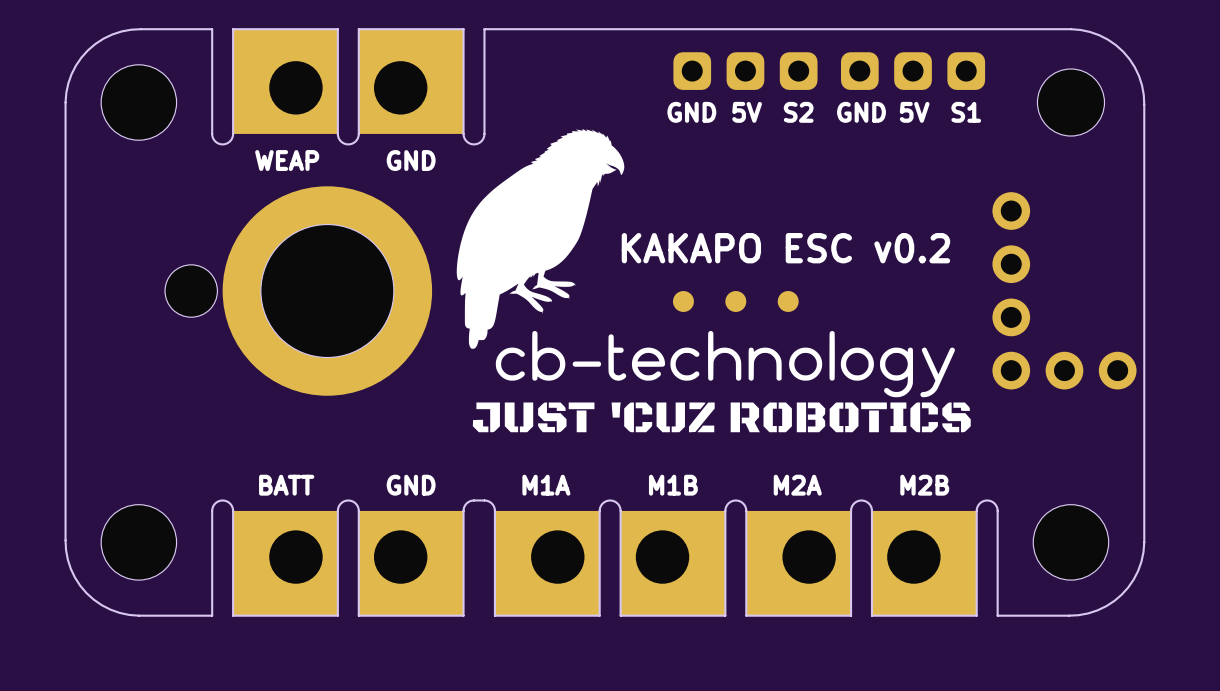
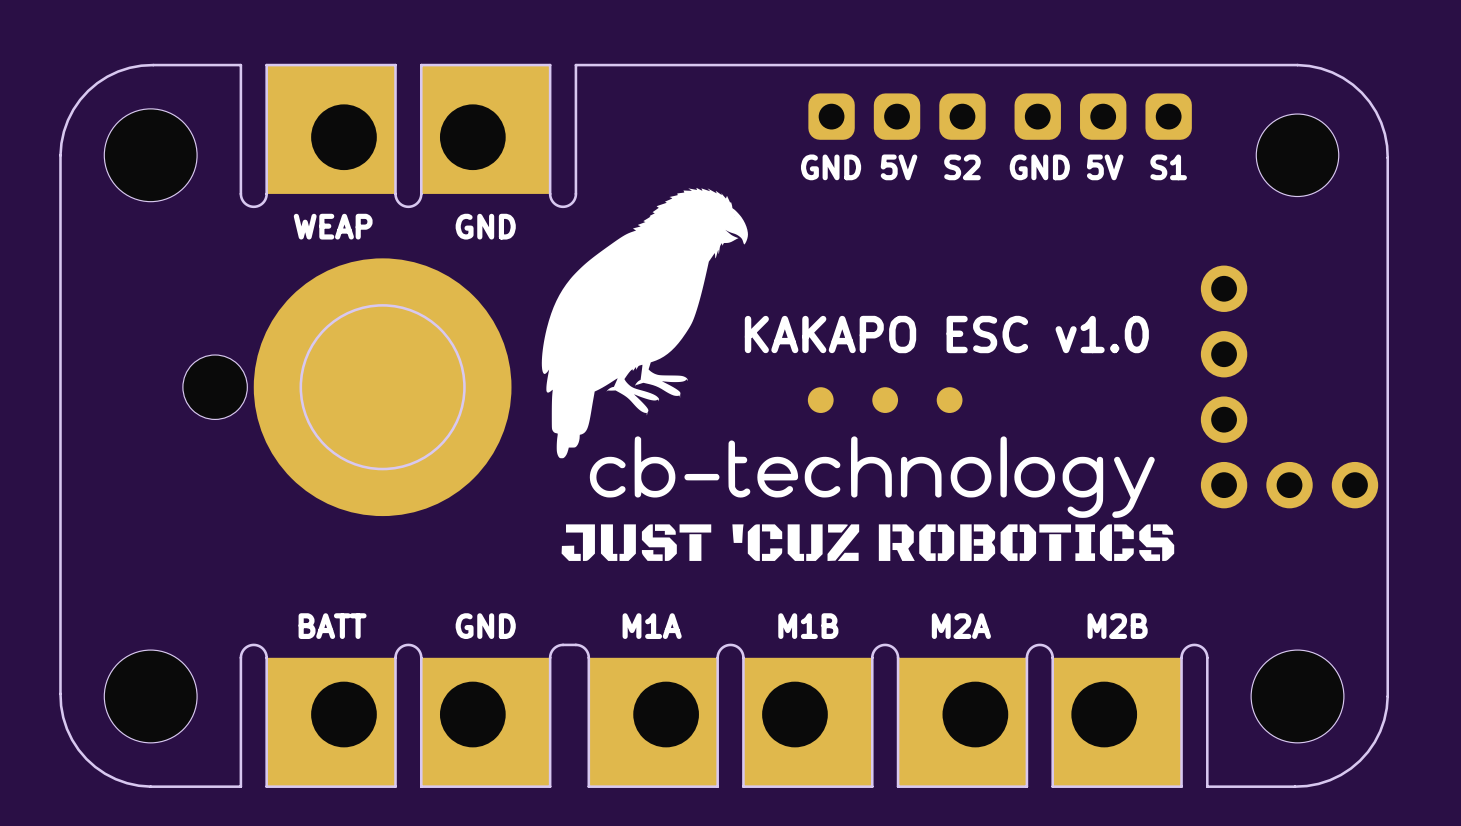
part footprint: [222, 186, 433, 396] -> [253, 258, 512, 517]
text: KAKAPO ESC v0.2 (785, 248) -> KAKAPO ESC v1.0 (946, 334)

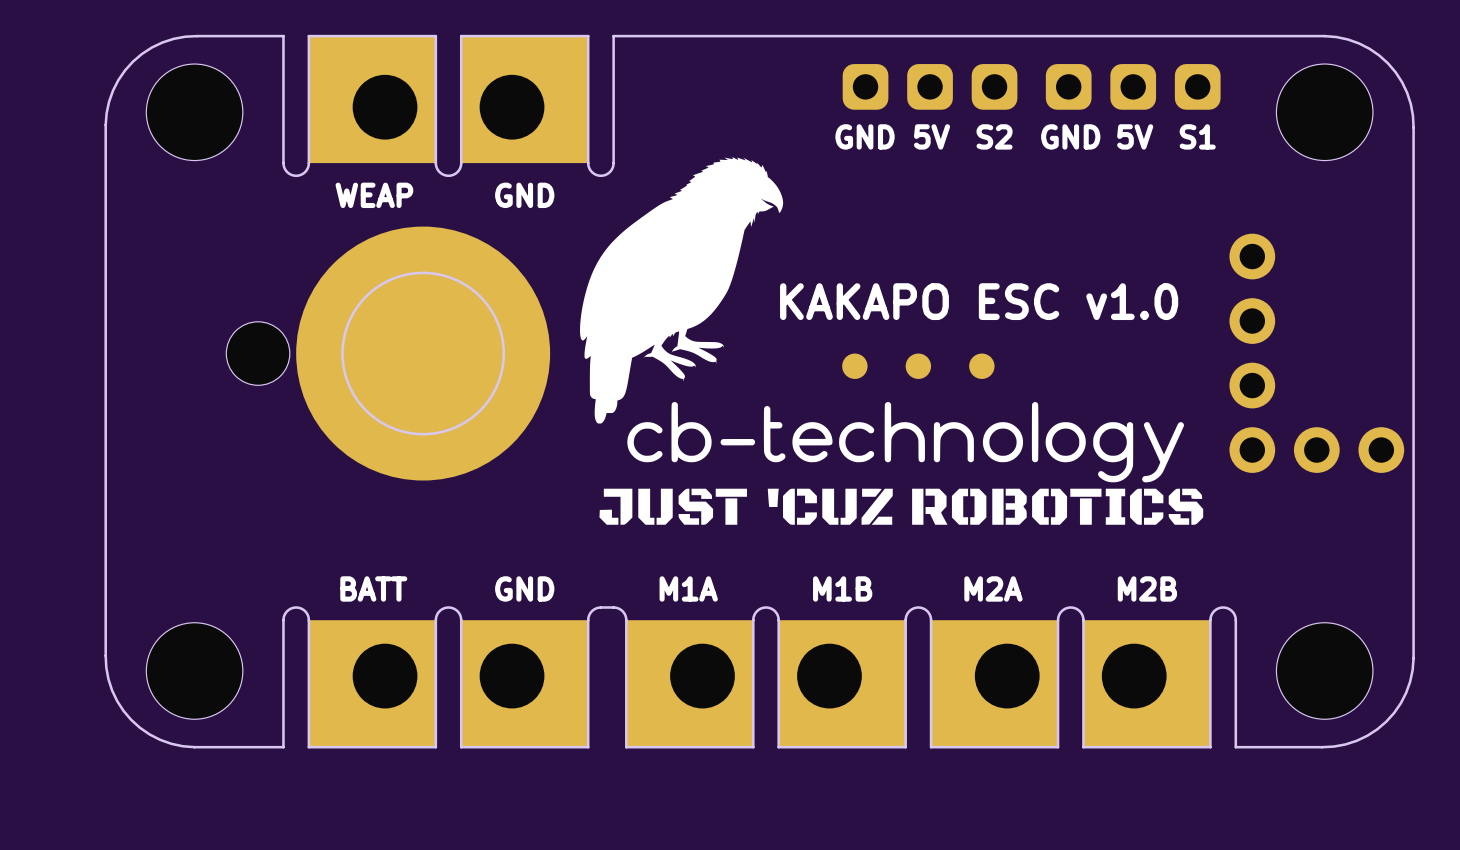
part footprint: [104, 108, 198, 202] -> [146, 64, 243, 161]
part footprint: [1256, 114, 1339, 197] -> [1276, 64, 1373, 161]
part footprint: [104, 650, 198, 743] -> [146, 622, 243, 720]
part footprint: [1251, 650, 1344, 743] -> [1276, 622, 1373, 720]

